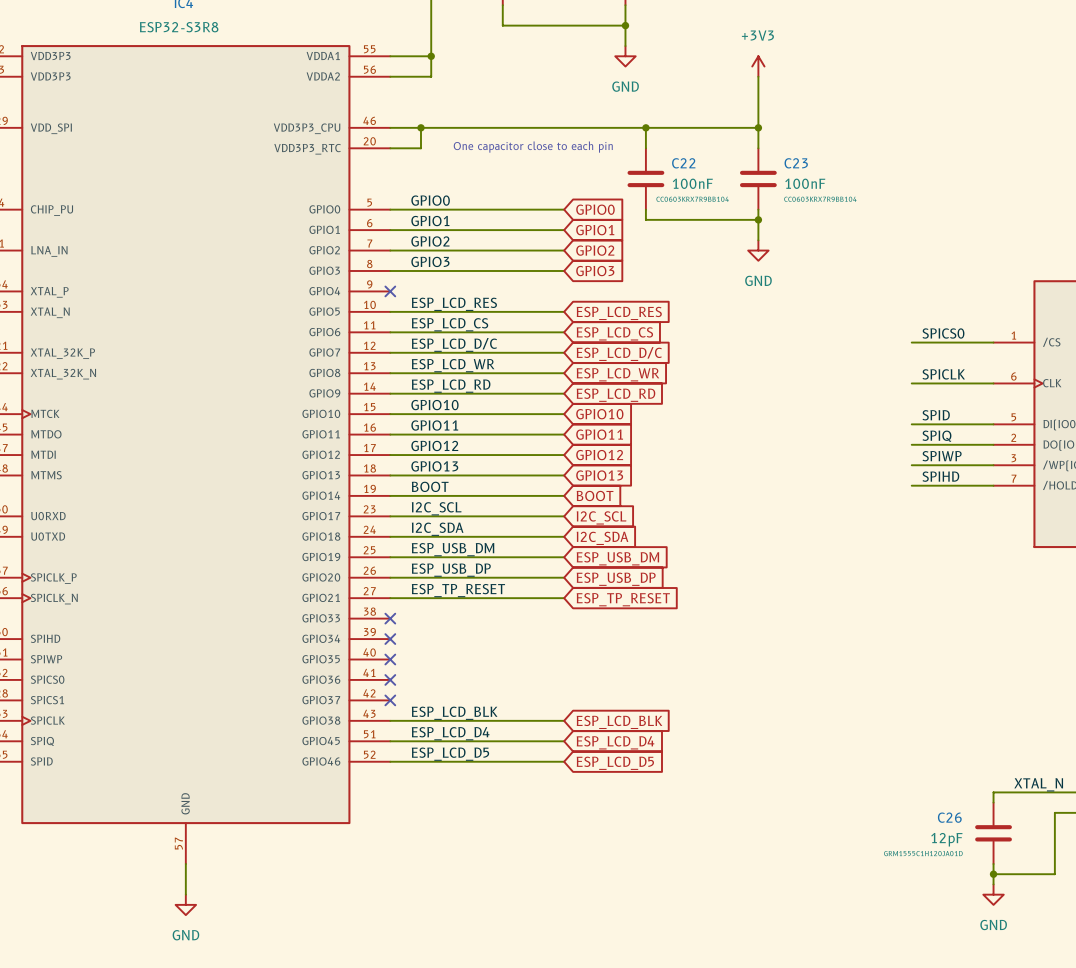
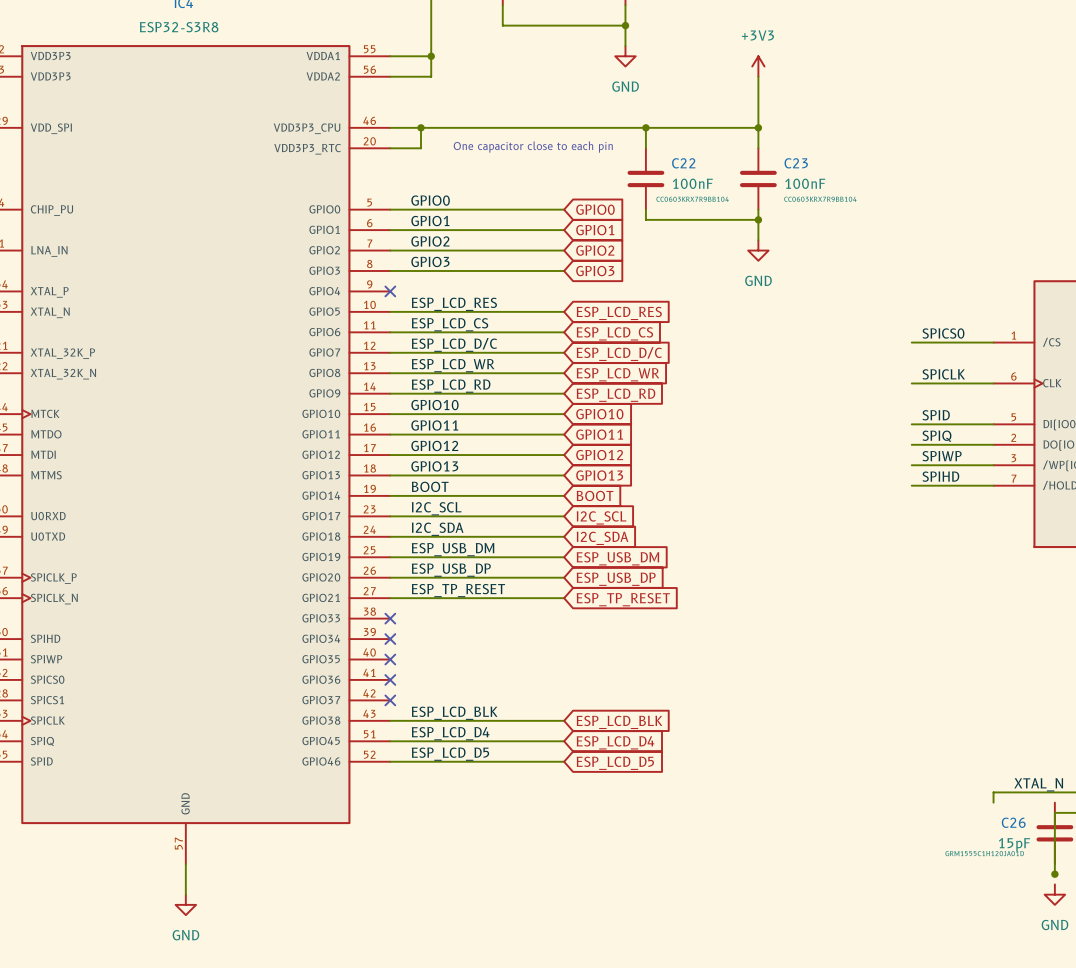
C26 name position: C26 (949, 817) -> C26 (1013, 822)
C26 position: (993, 833) -> (1054, 833)
C26 value: 12pF (946, 839) -> 15pF (1014, 844)
wire: (993, 863) (993, 884) -> none
wire: (993, 874) (1054, 874) -> none
junction: (993, 874) -> none
junction: none -> (1054, 874)
power symbol position: GND (993, 894) -> GND (1054, 894)

